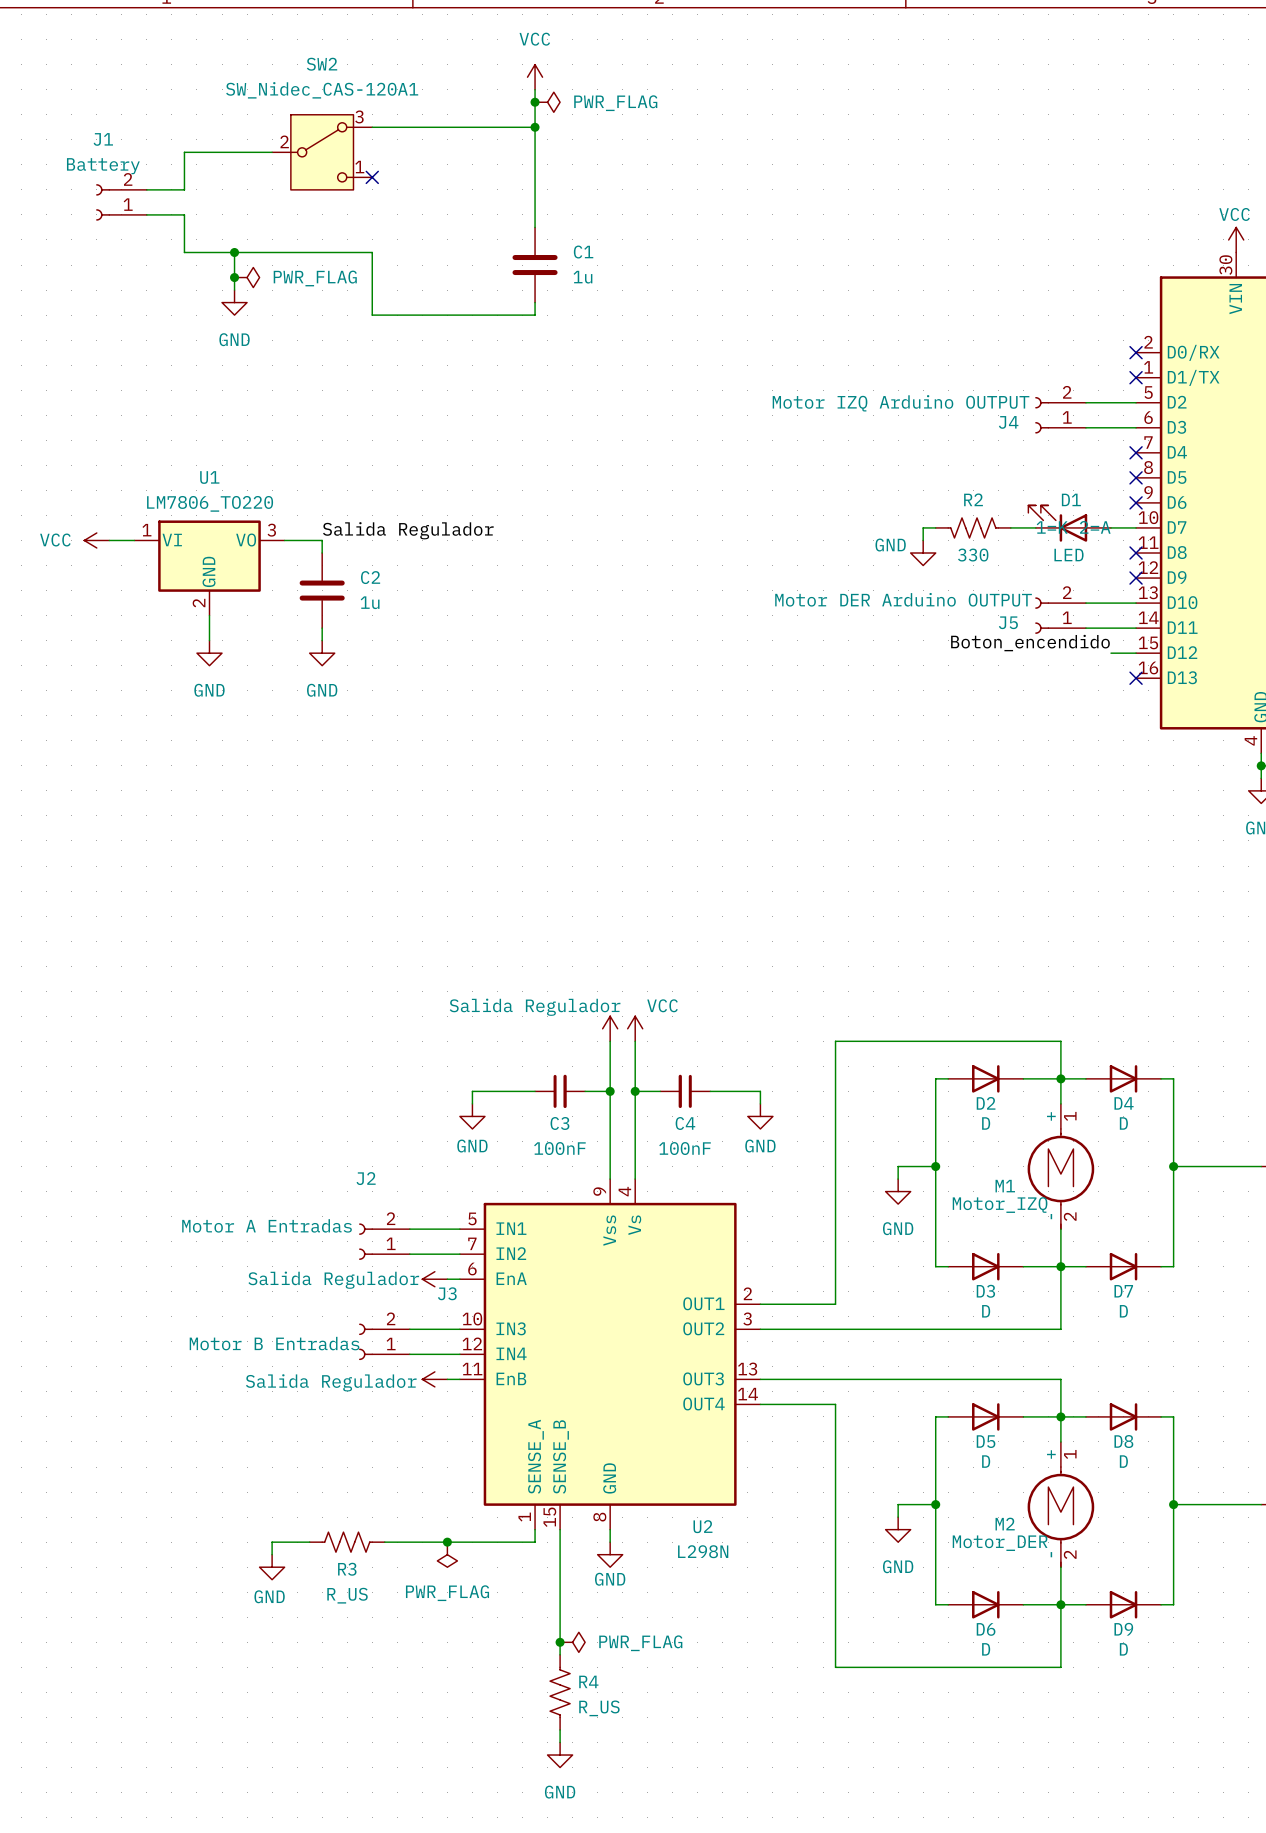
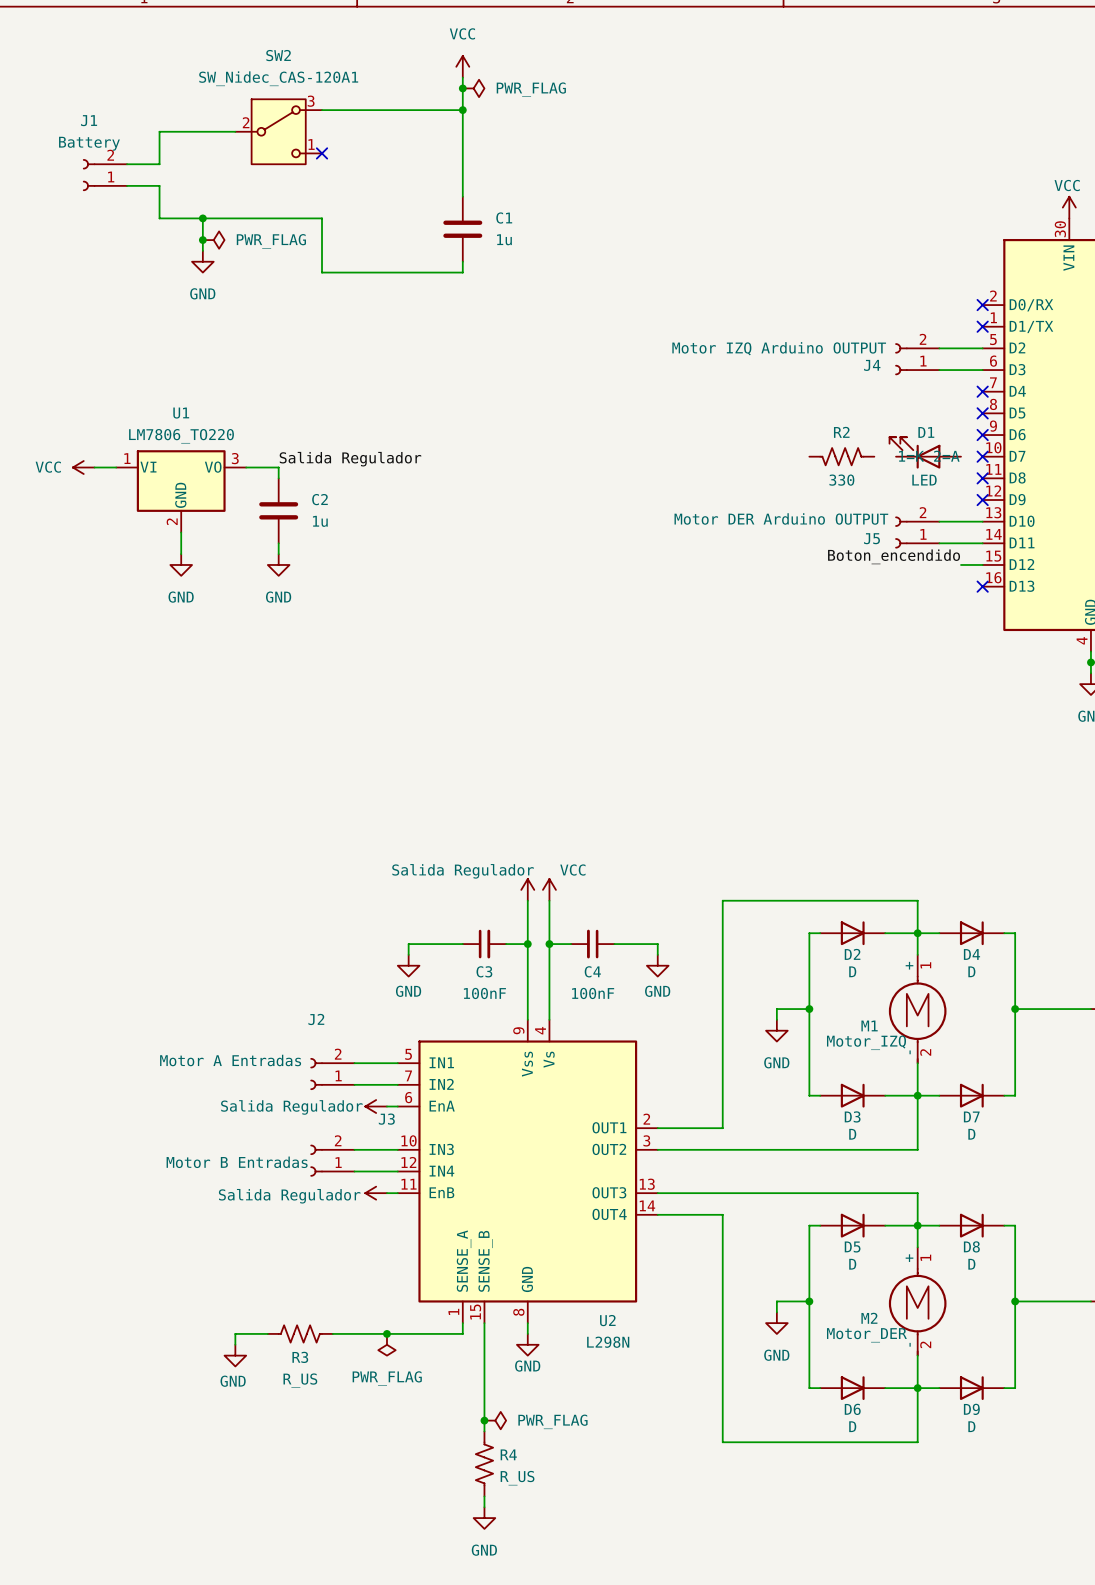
wire: (935, 527) (923, 527) (923, 540) -> none
wire: (1010, 527) (1035, 527) -> none
wire: (1111, 527) (1136, 527) -> none
no-connect mark: none -> (982, 456)
power symbol: GND (923, 553) -> none

